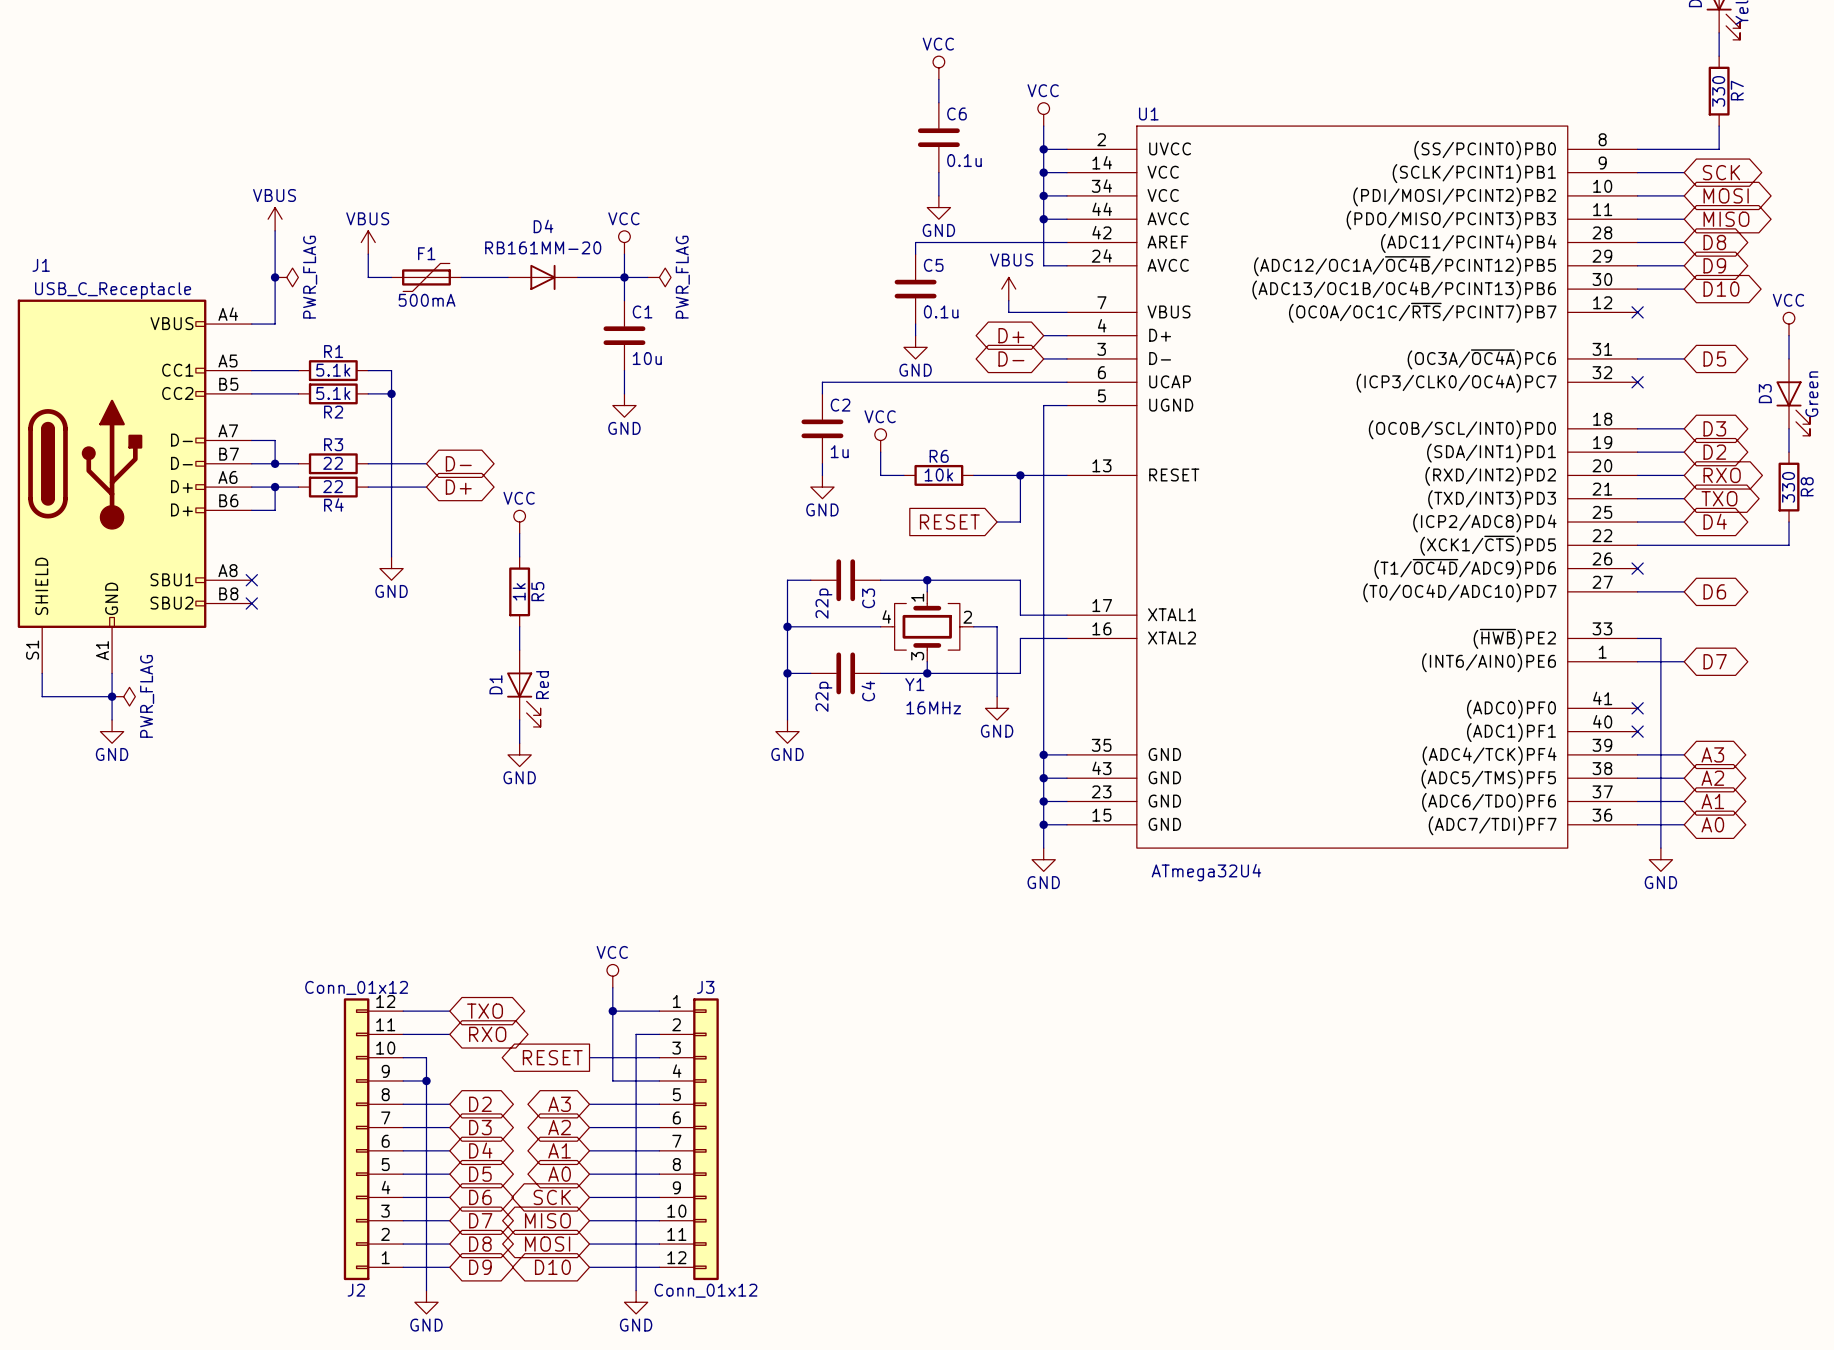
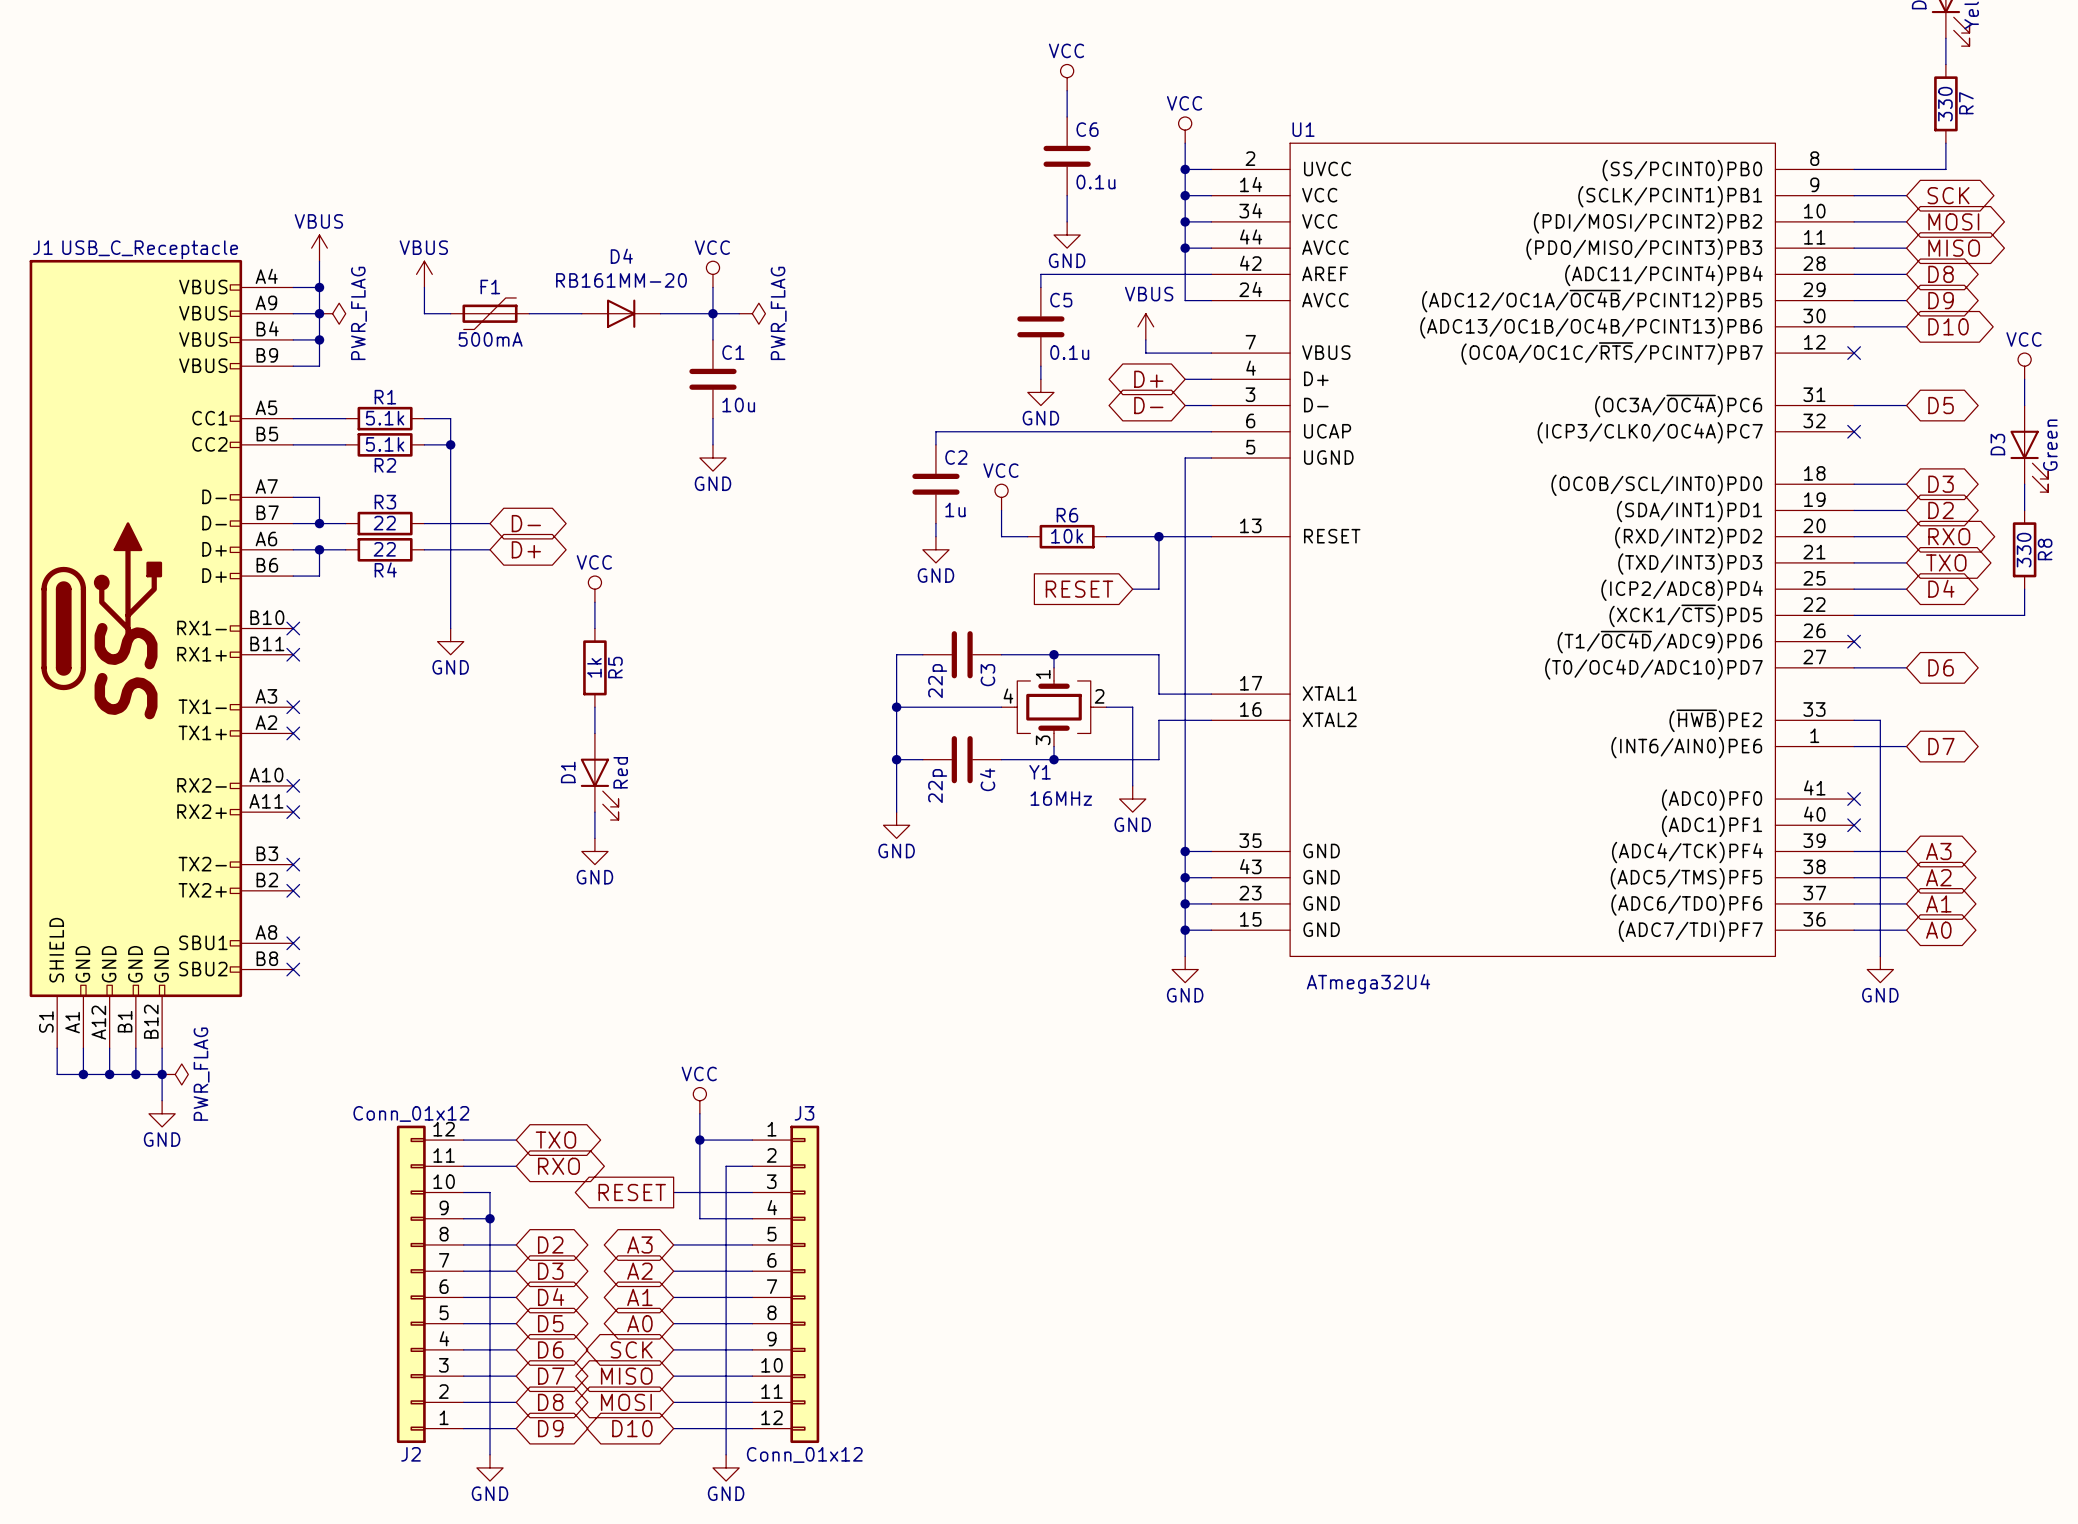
wire: none -> (293, 287) (319, 287)
junction: none -> (319, 287)
J1 name position: J1 (41, 265) -> J1 (42, 247)
wire: none -> (293, 313) (319, 313)
J1 value position: USB_C_Receptacle (113, 290) -> USB_C_Receptacle (150, 249)
J1 symbol: [17, 299, 252, 674] -> [29, 259, 294, 1049]
wire: none -> (293, 339) (319, 339)
junction: none -> (319, 339)
no-connect mark: none -> (293, 628)
no-connect mark: (251, 603) -> none
no-connect mark: none -> (293, 707)
no-connect mark: none -> (293, 733)
junction: (112, 696) -> none
power symbol: PWR_FLAG (123, 696) -> none
no-connect mark: none -> (293, 785)
no-connect mark: none -> (293, 812)
power symbol: GND (112, 731) -> none
no-connect mark: none -> (293, 864)
no-connect mark: none -> (293, 890)
no-connect mark: none -> (293, 943)
no-connect mark: none -> (293, 969)
wire: none -> (57, 1048) (57, 1074) (162, 1074)
wire: none -> (83, 1048) (83, 1074)
wire: none -> (109, 1048) (109, 1074)
wire: none -> (135, 1048) (135, 1074)
wire: none -> (162, 1048) (162, 1100)
junction: none -> (83, 1074)
junction: none -> (109, 1074)
junction: none -> (135, 1074)
junction: none -> (162, 1074)
power symbol: none -> PWR_FLAG (175, 1074)
power symbol: none -> GND (162, 1113)

